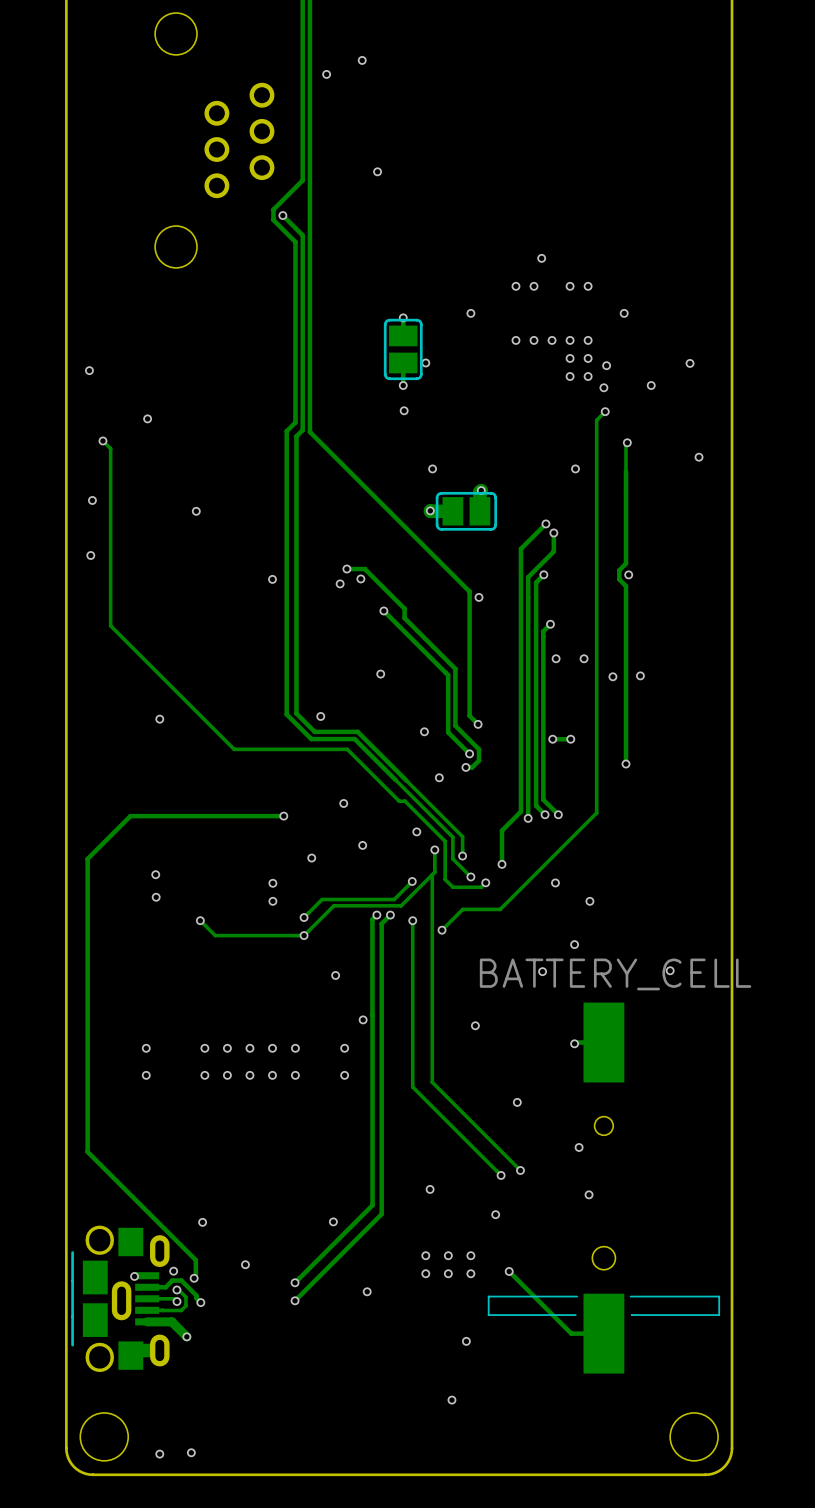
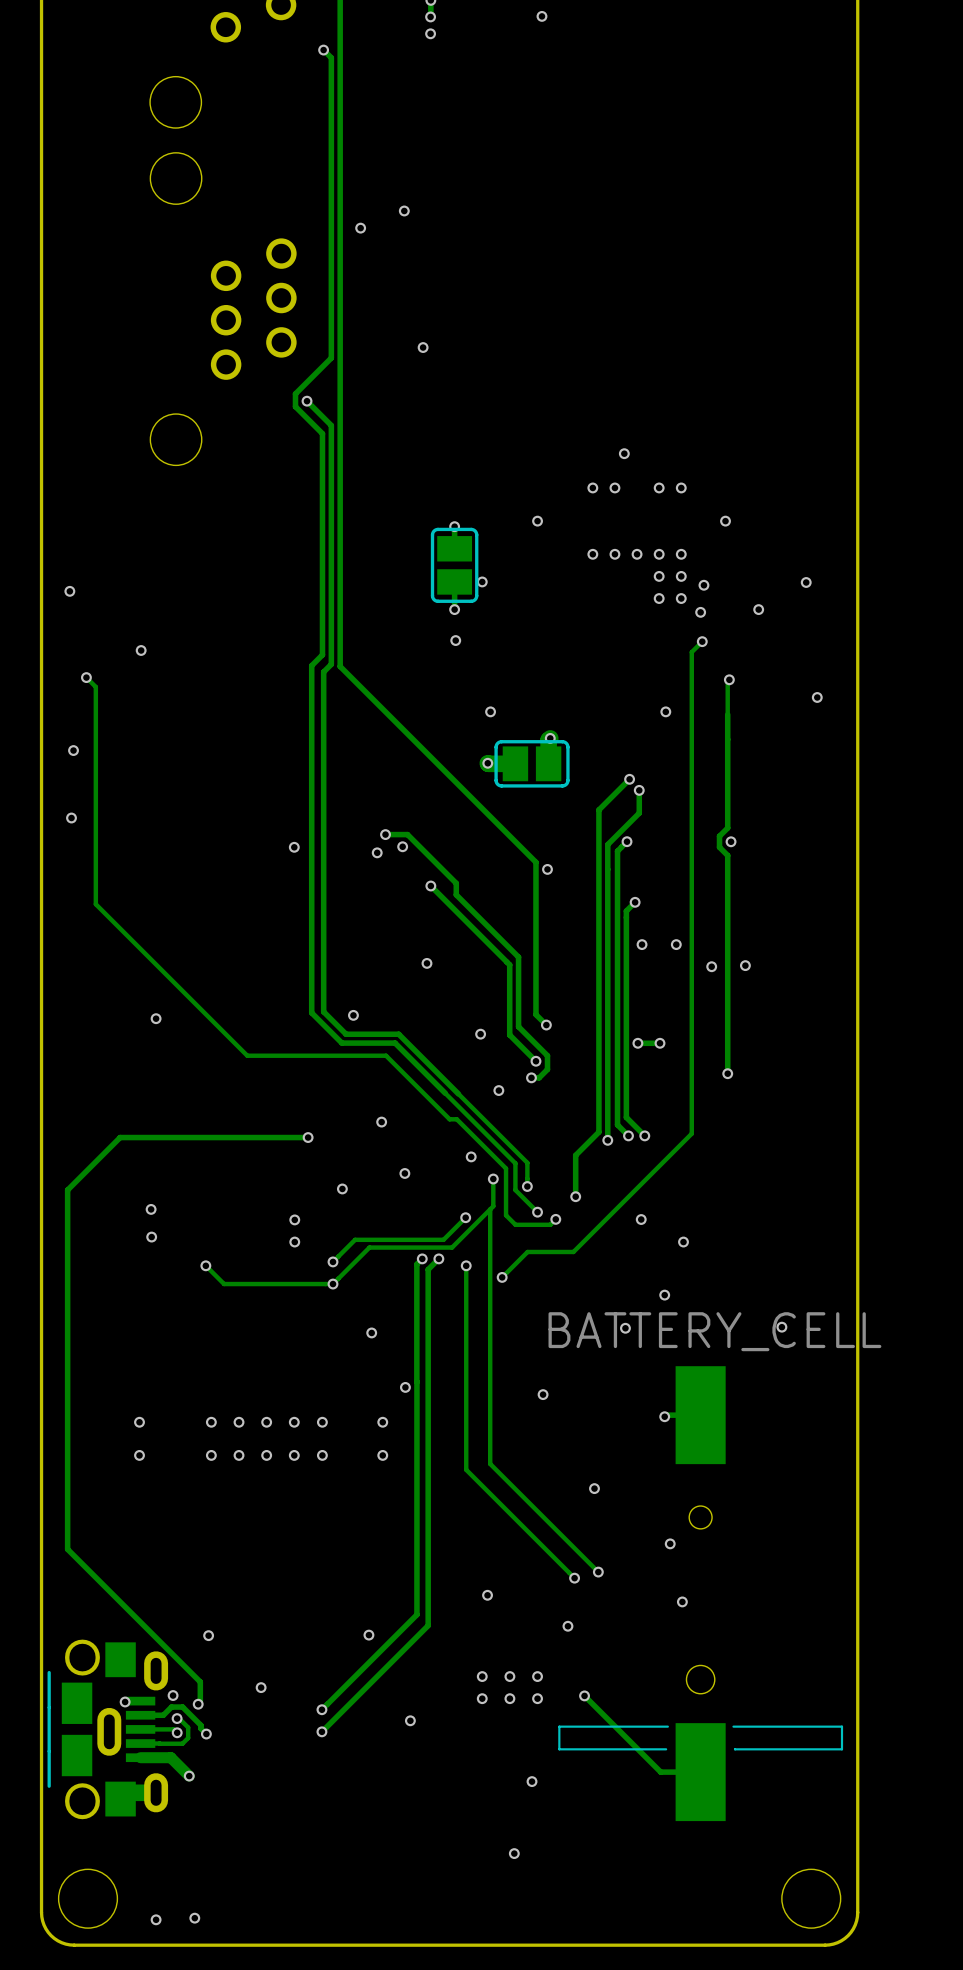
via: (196, 511) -> none

